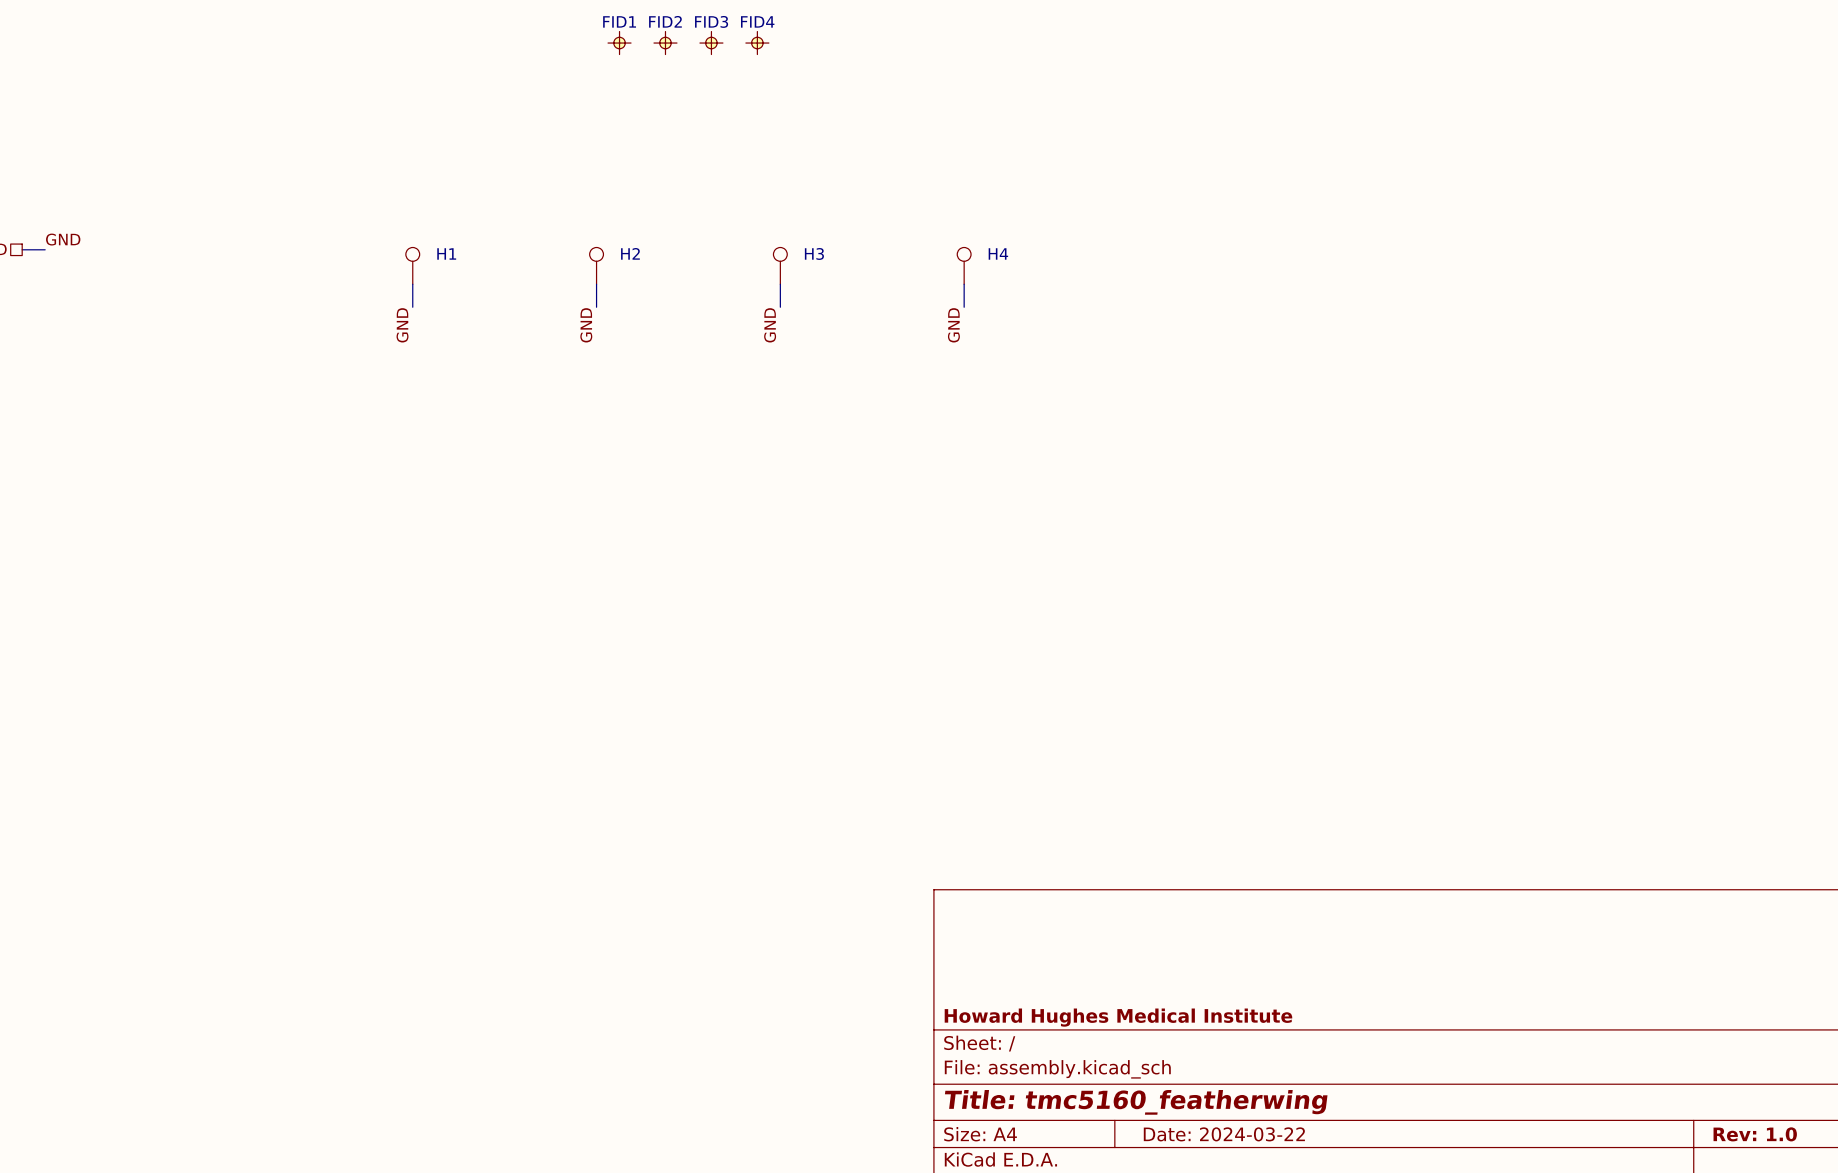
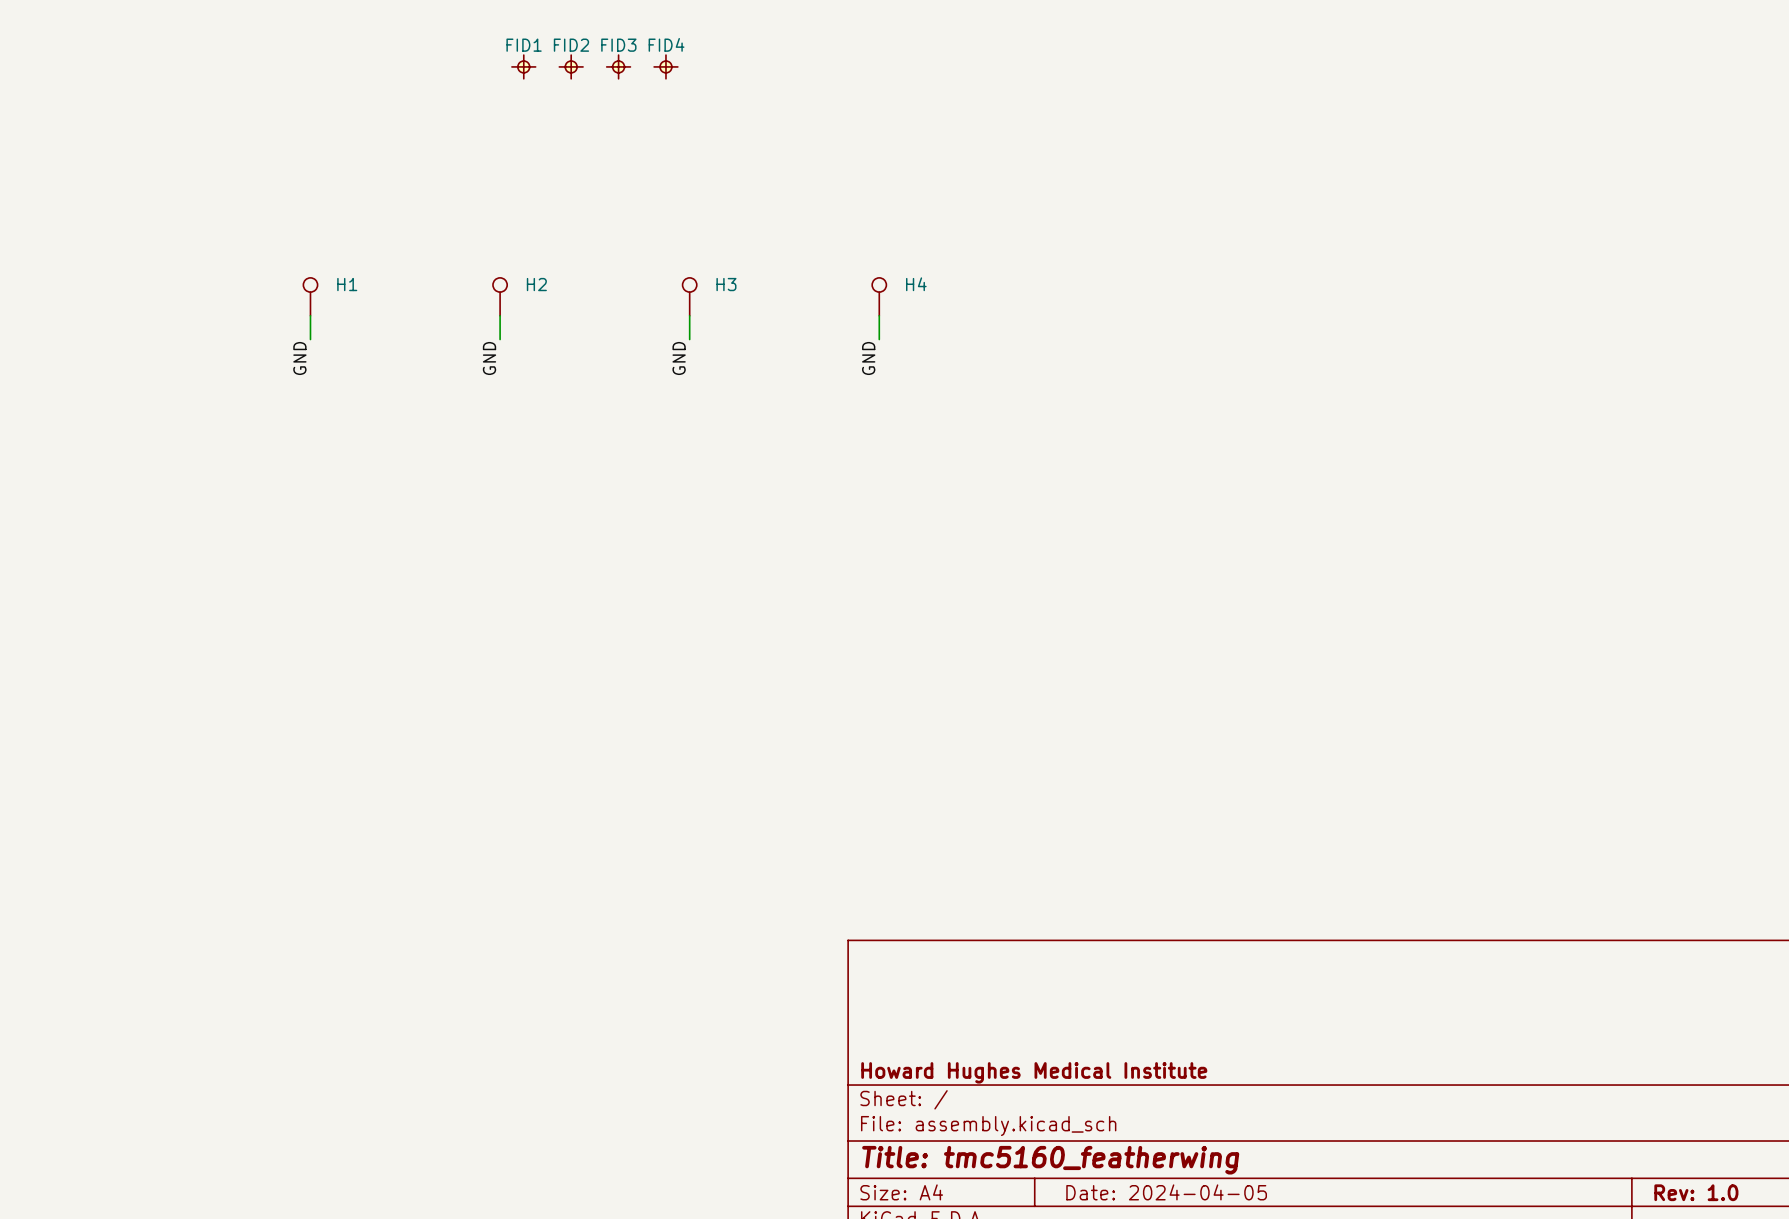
title block: Date: 2024-03-22 (1224, 1134) -> Date: 2024-04-05 (1166, 1192)

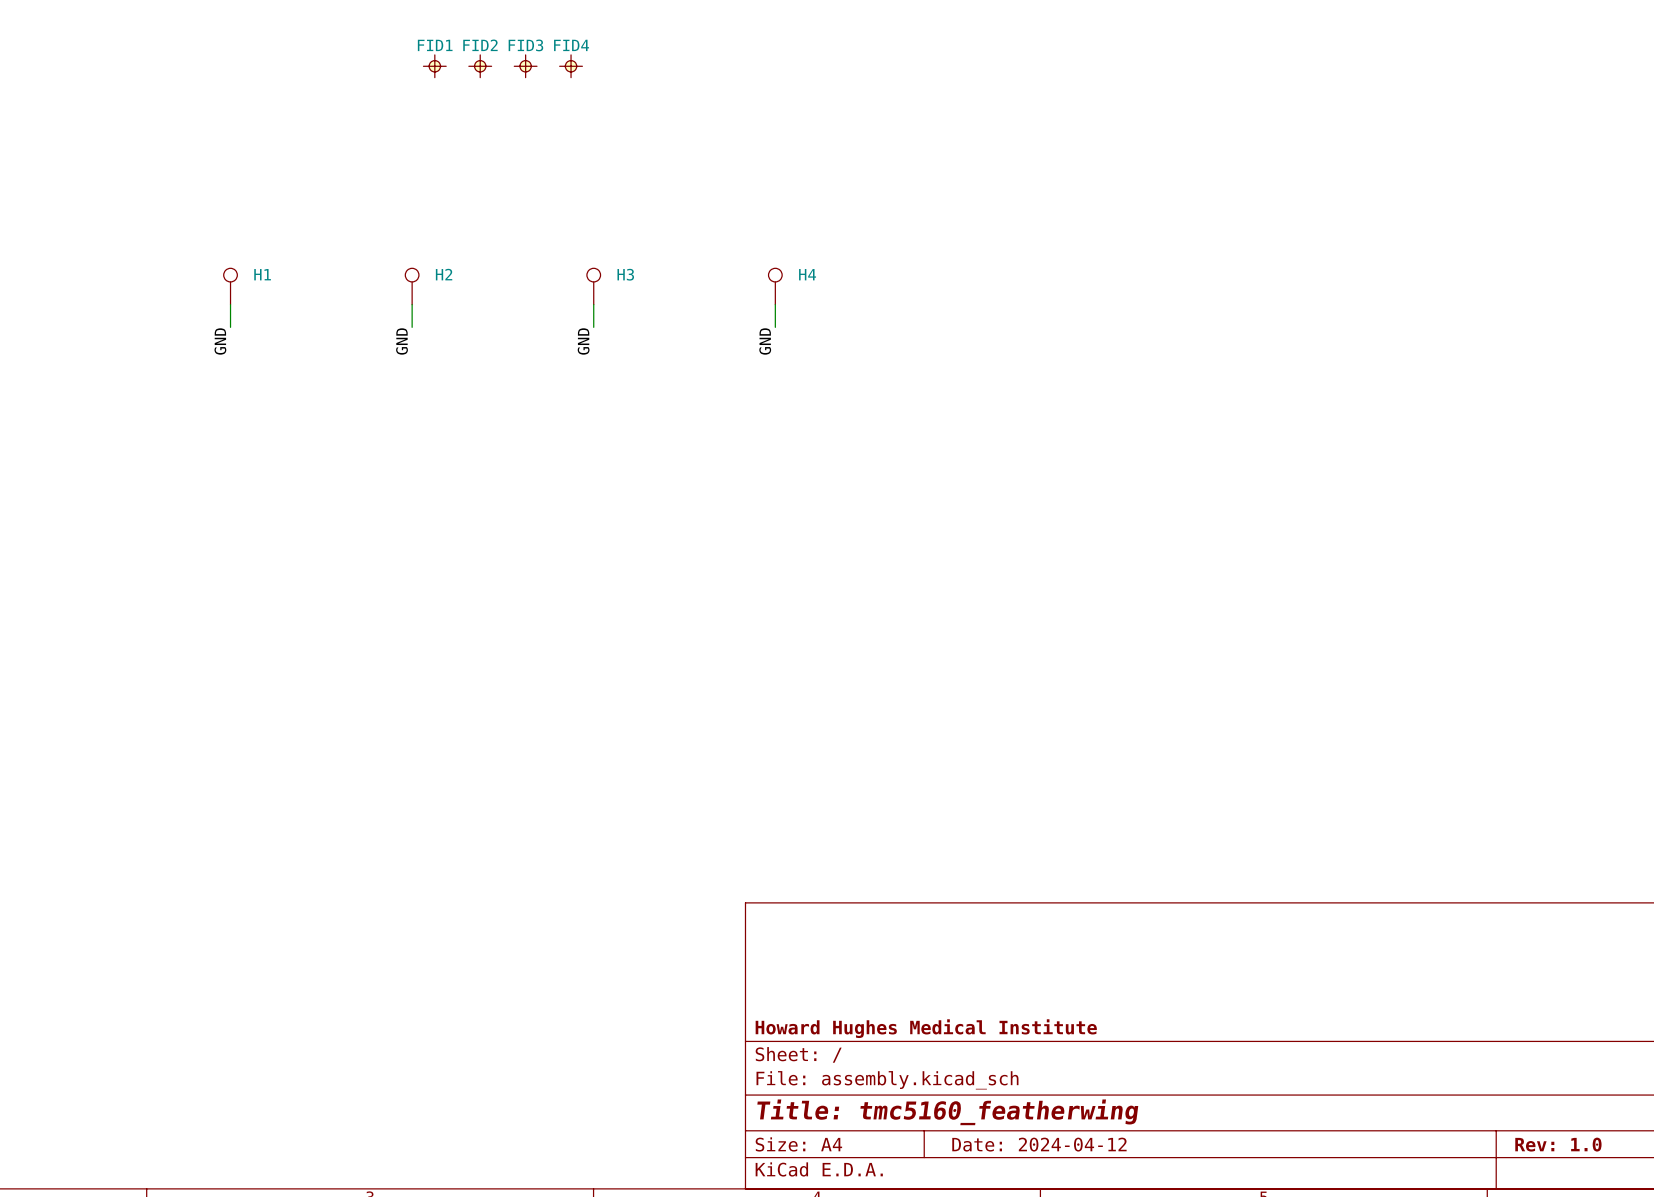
title block: Date: 2024-04-05 (1166, 1192) -> Date: 2024-04-12 (1039, 1144)

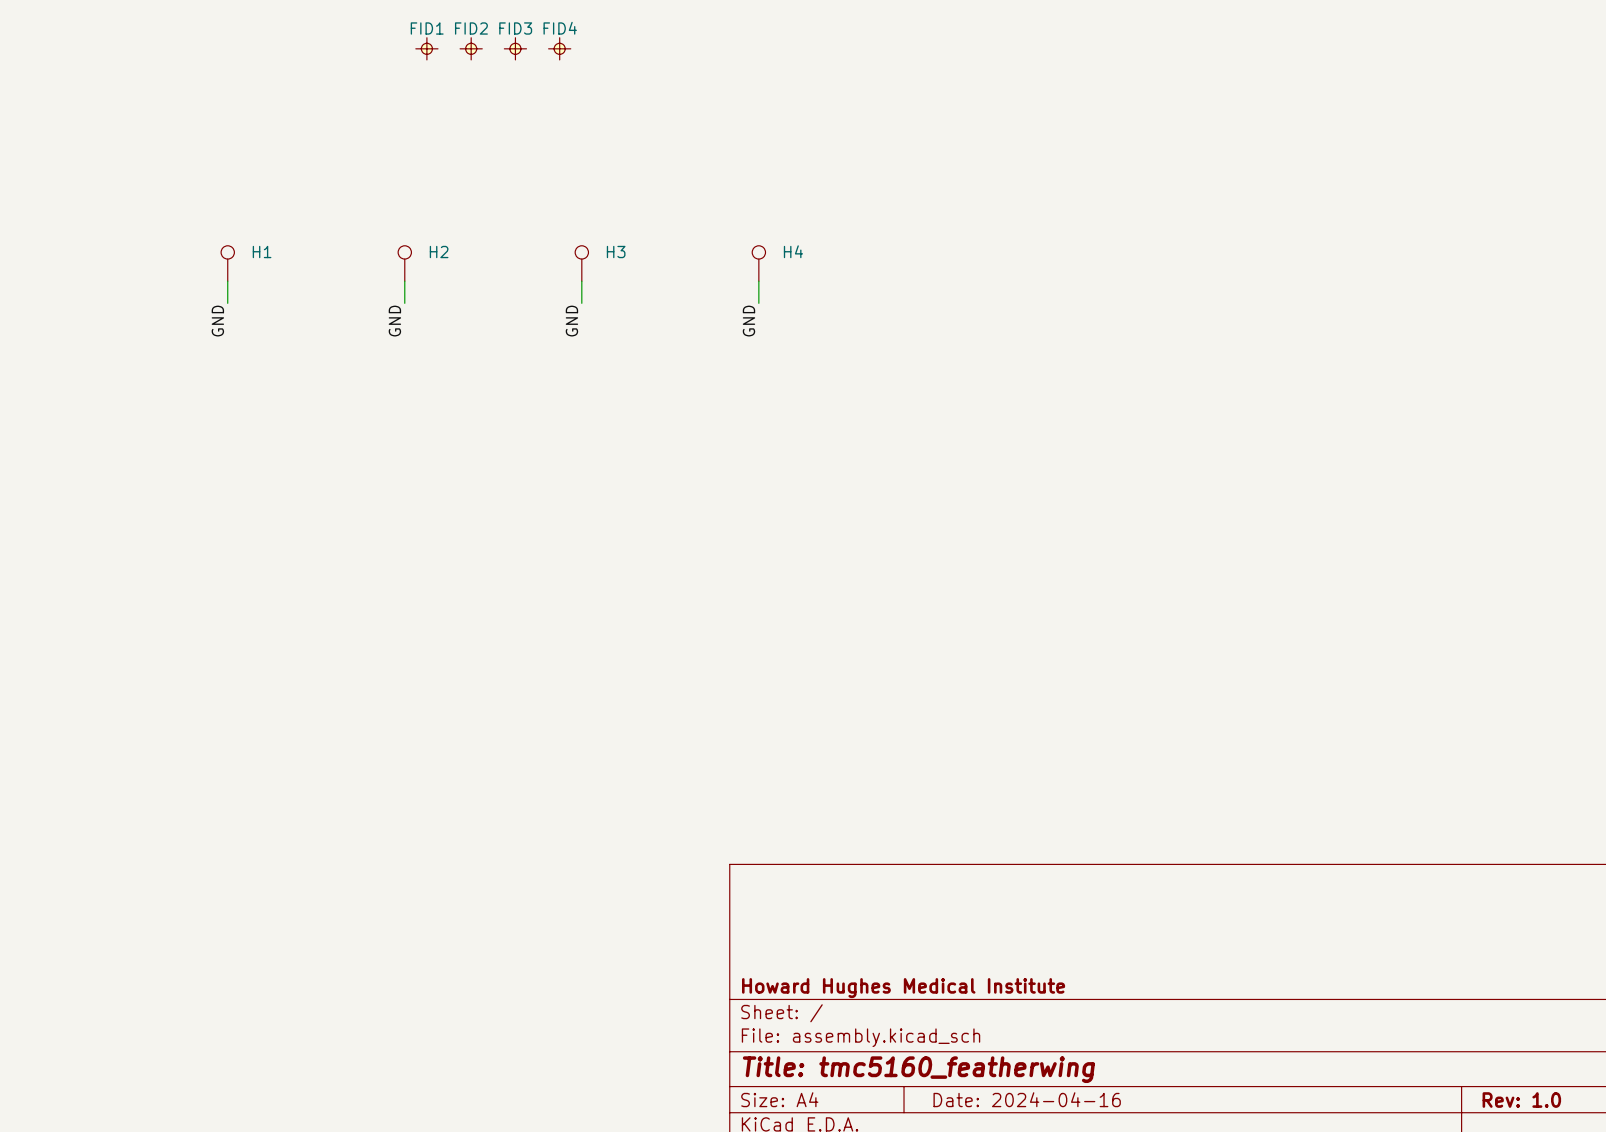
title block: Date: 2024-04-12 (1039, 1144) -> Date: 2024-04-16 (1027, 1099)

